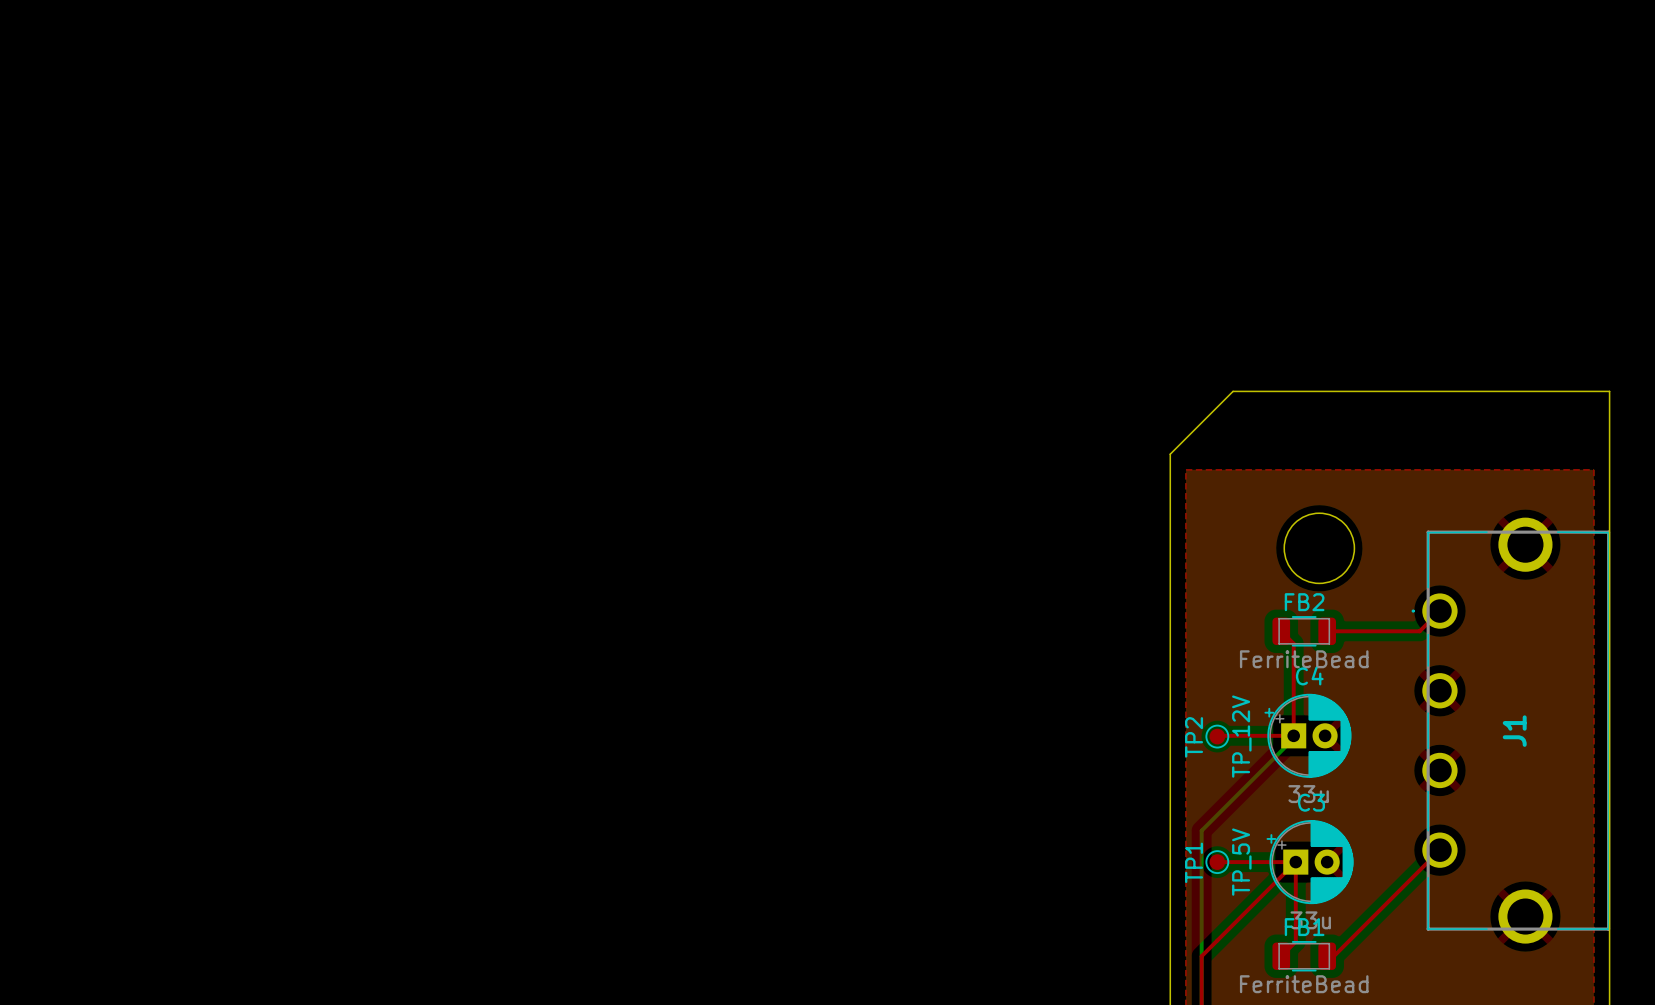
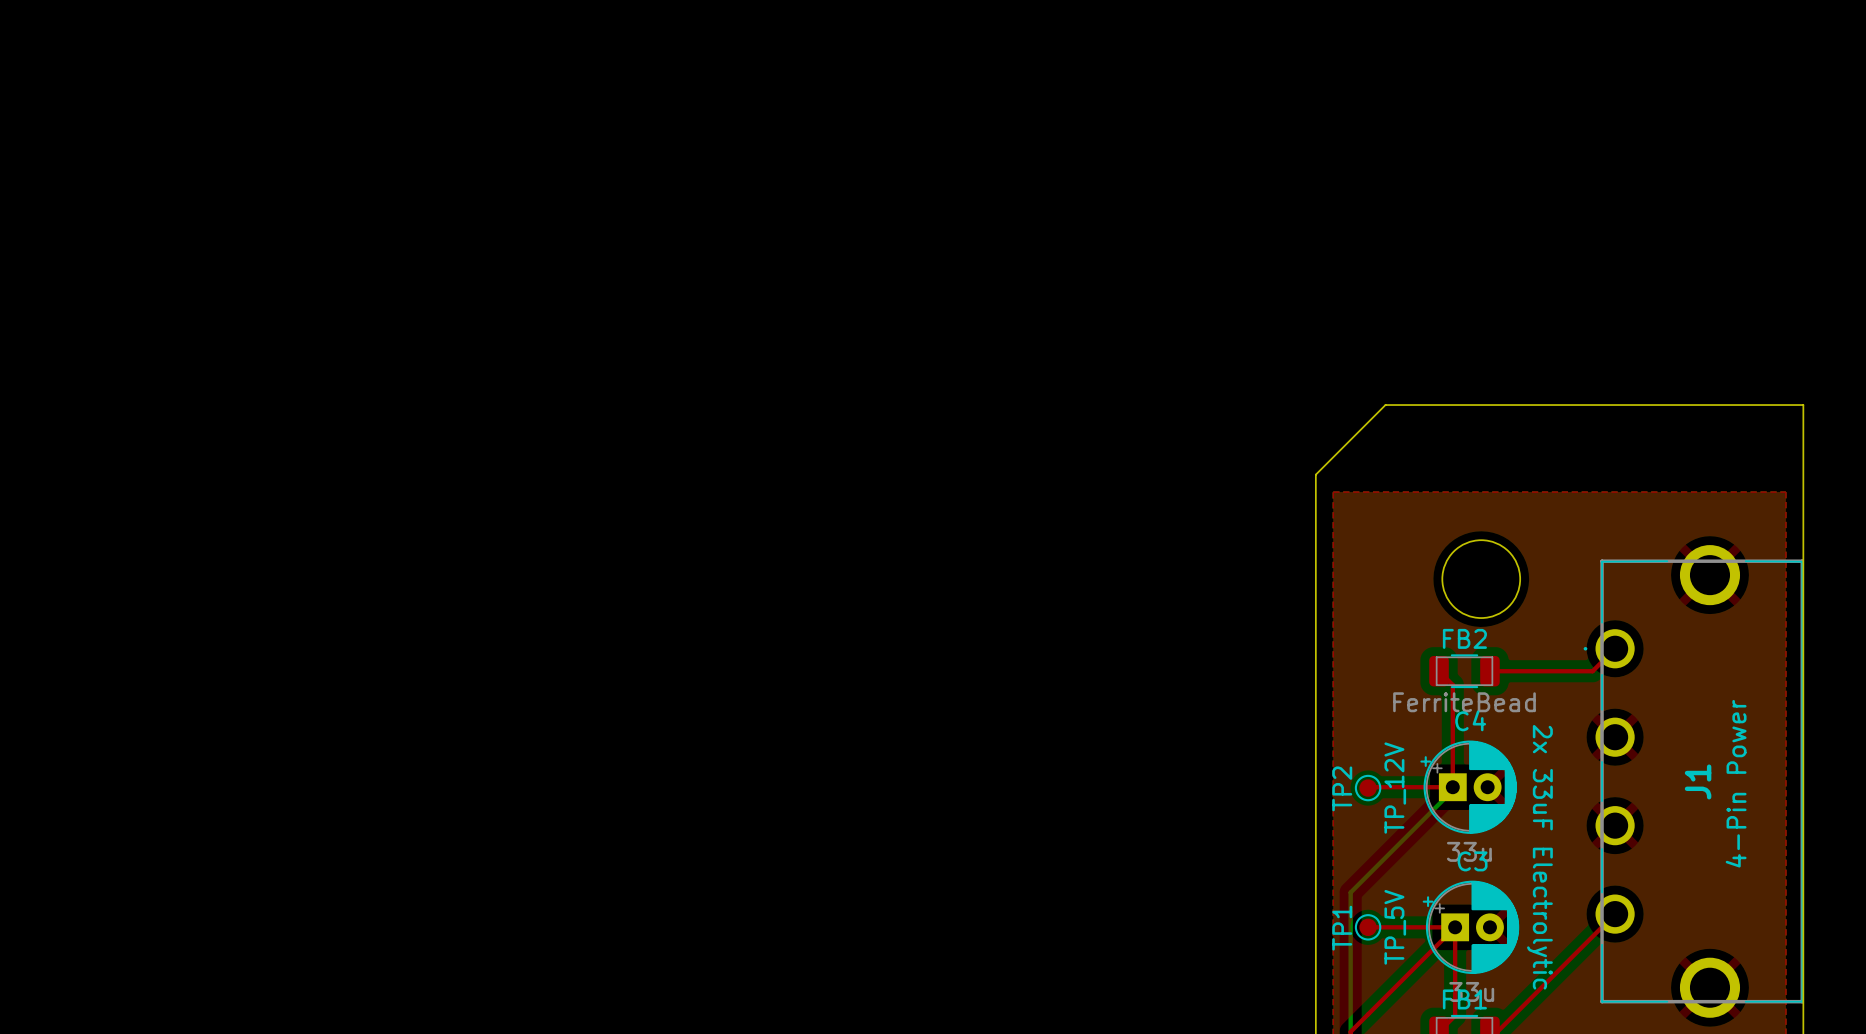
text: none -> 4-Pin Power (1736, 783)
text: none -> 2x 33uF Electrolytic (1539, 857)

